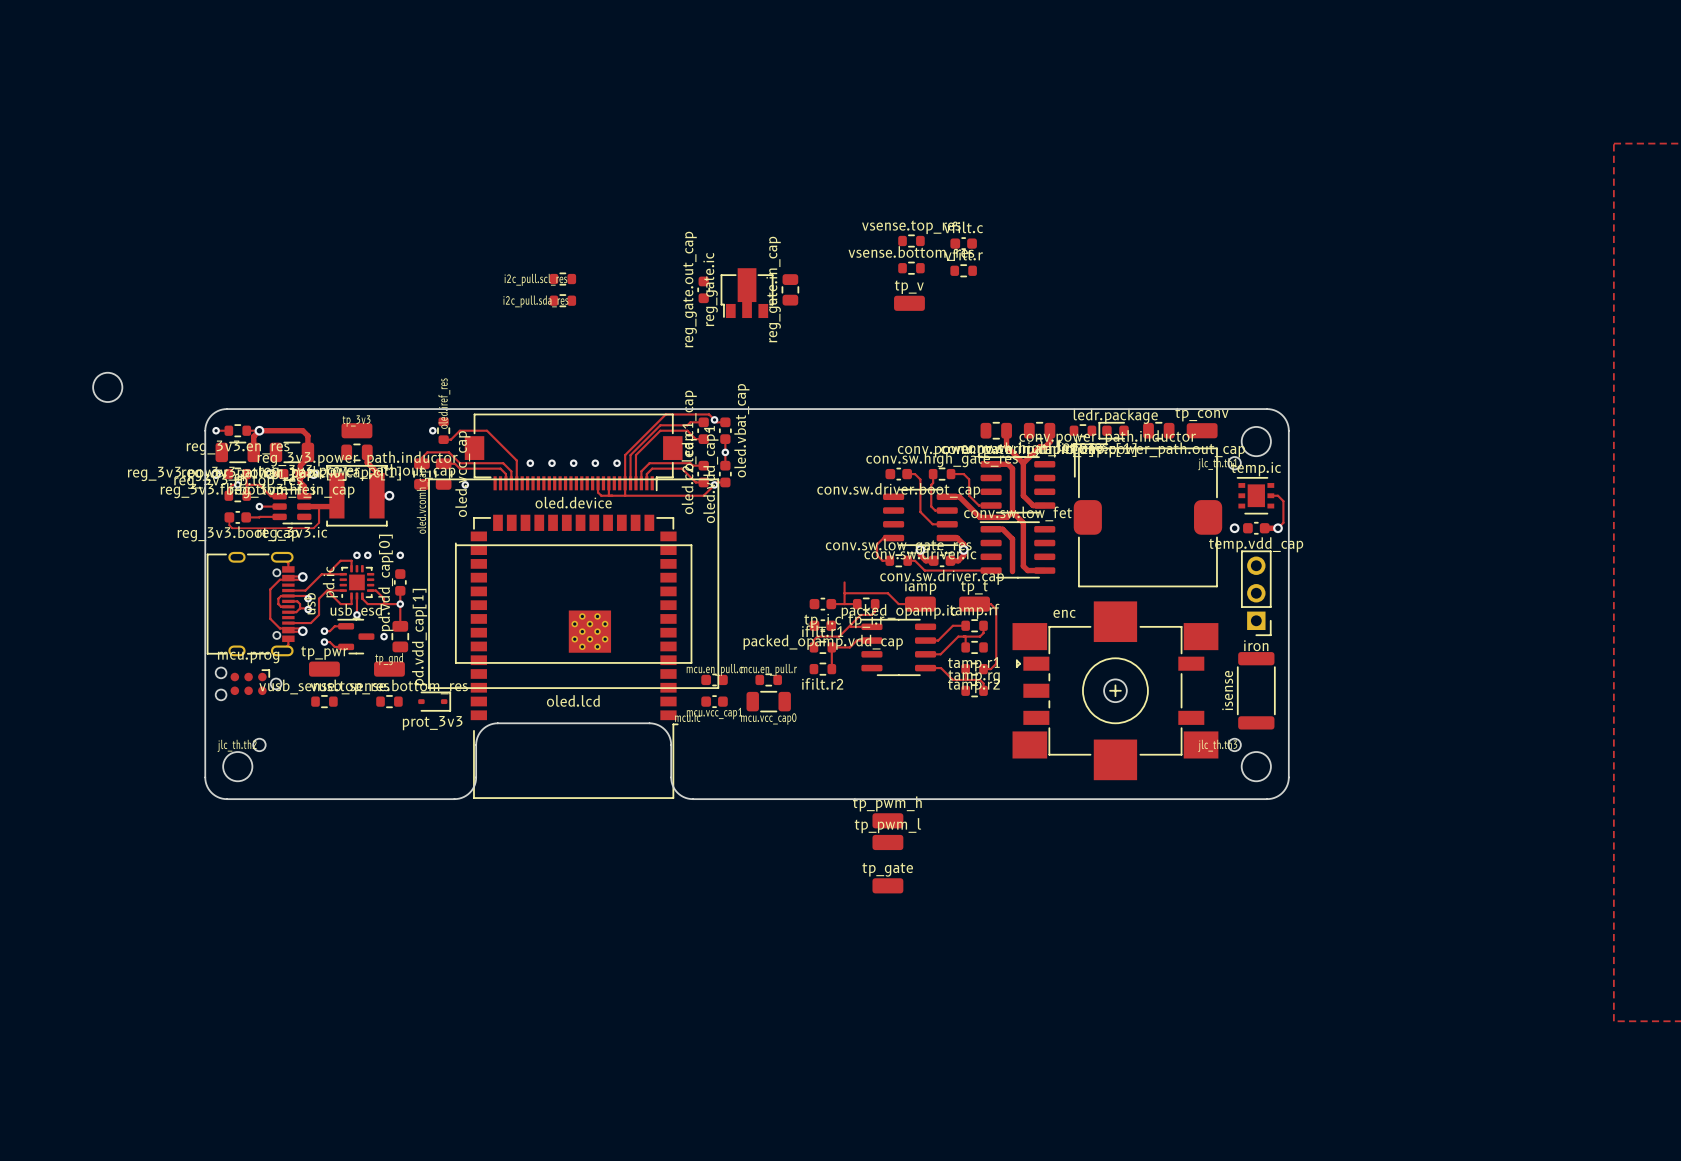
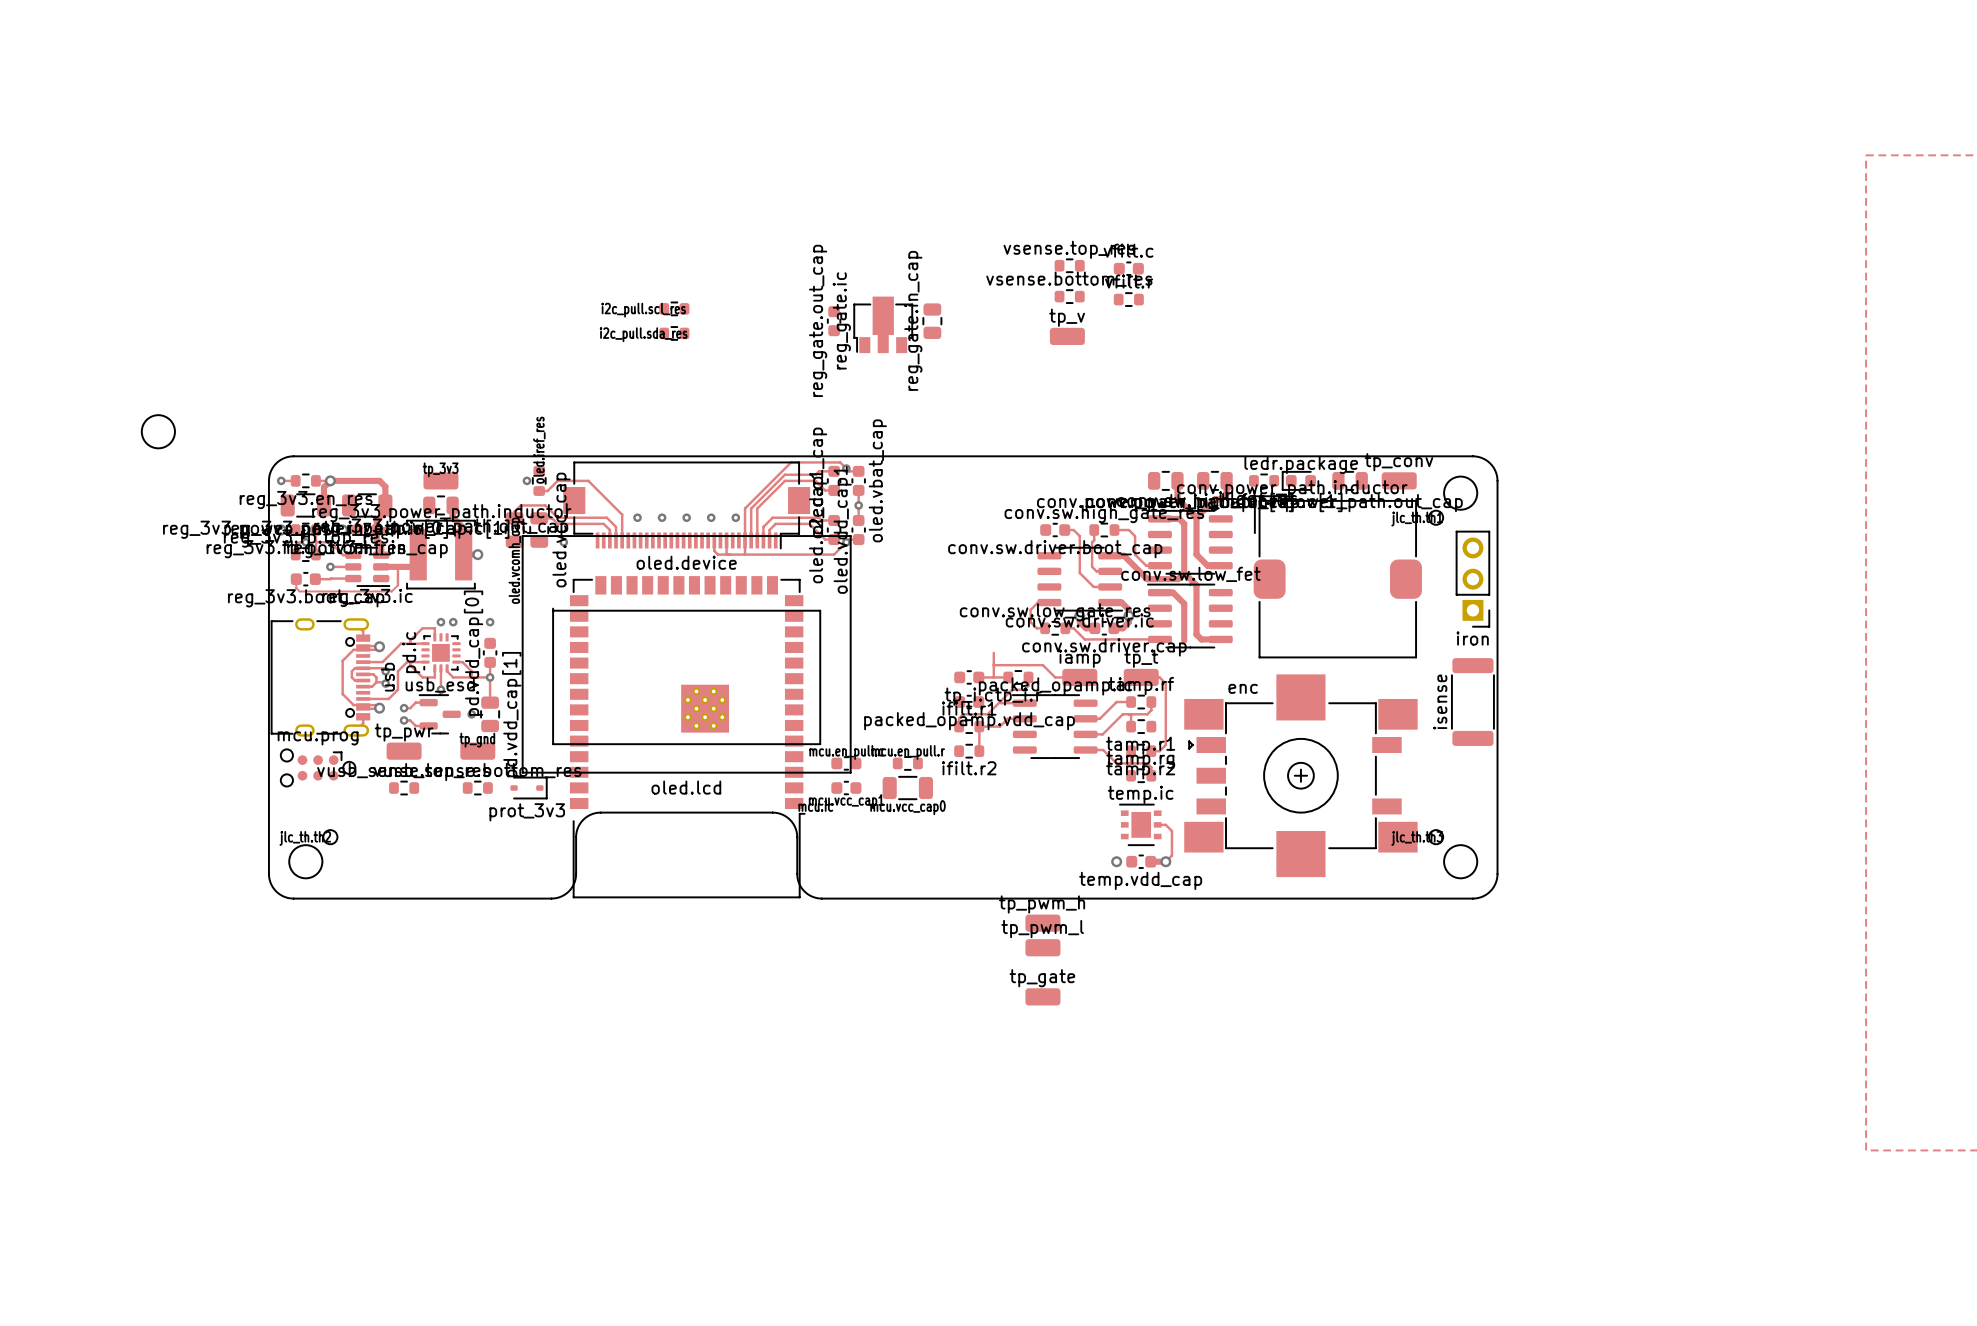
temp.ic: (1255, 495) -> none
track: (1270, 495) (1277, 495) (1283, 501) (1283, 522) (1277, 528) (1264, 528) -> none
via: (1234, 528) -> none
temp.vdd_cap: (1256, 528) -> none
via: (1277, 528) -> none
iron position: (1256, 593) -> (1472, 579)
isense position: (1256, 690) -> (1472, 702)
temp.ic: none -> (1140, 824)
track: none -> (1157, 824) (1165, 824) (1171, 831) (1171, 855) (1165, 861) (1150, 861)
via: none -> (1116, 861)
temp.vdd_cap: none -> (1141, 861)
via: none -> (1165, 861)

